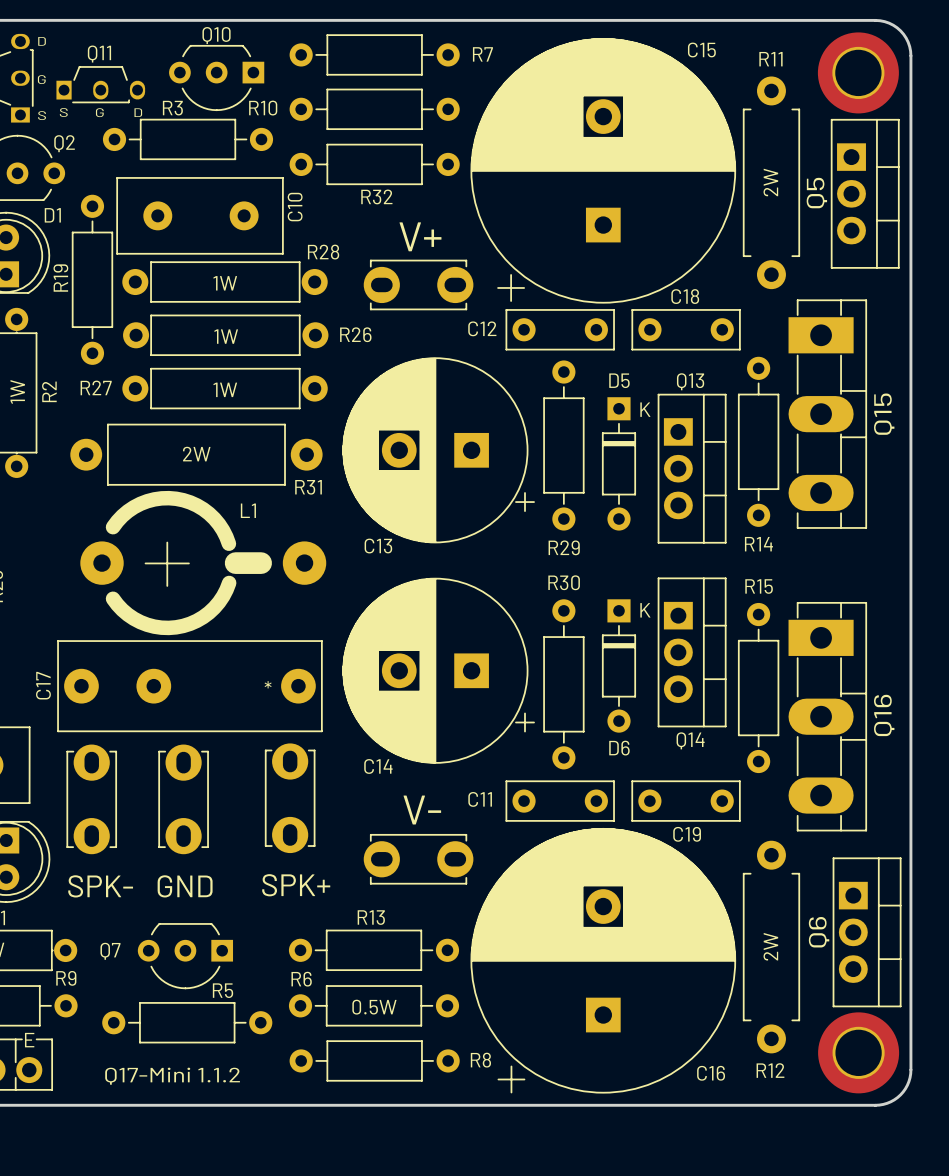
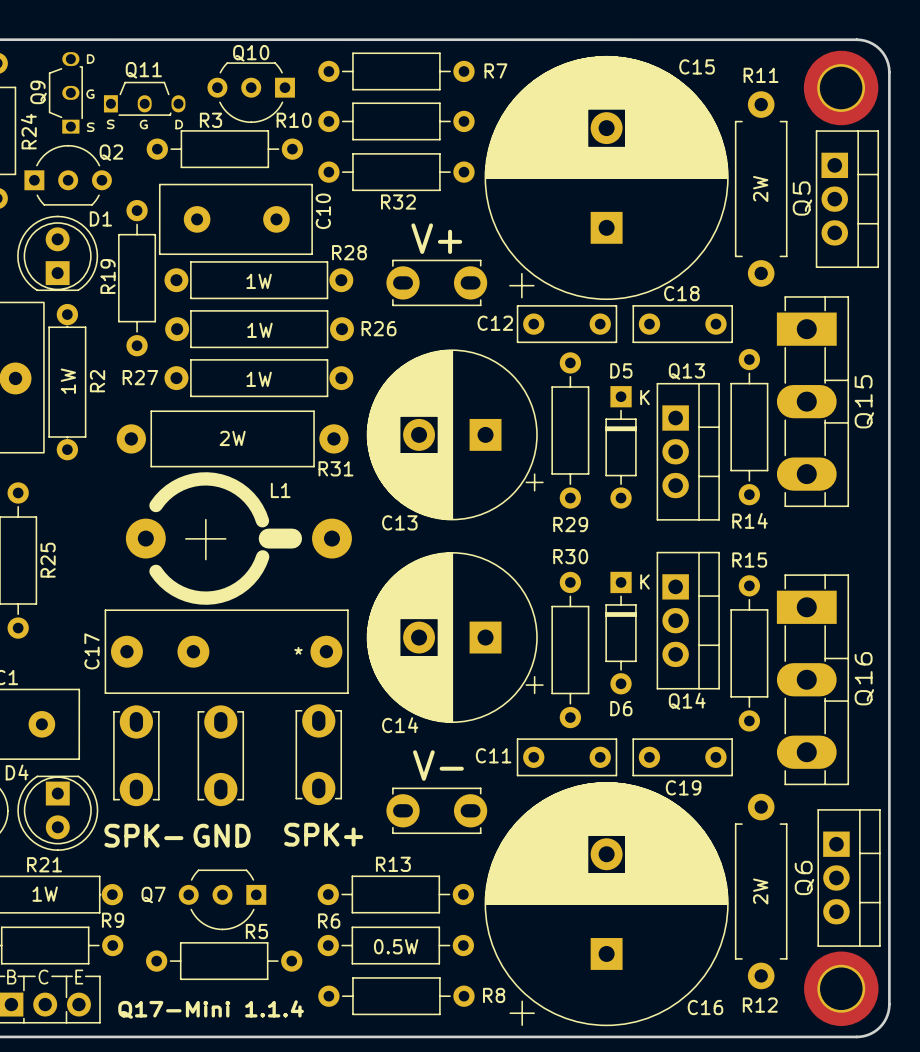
text: Q17-Mini 1.1.2 (172, 1076) -> Q17-Mini 1.1.4 (211, 1009)

